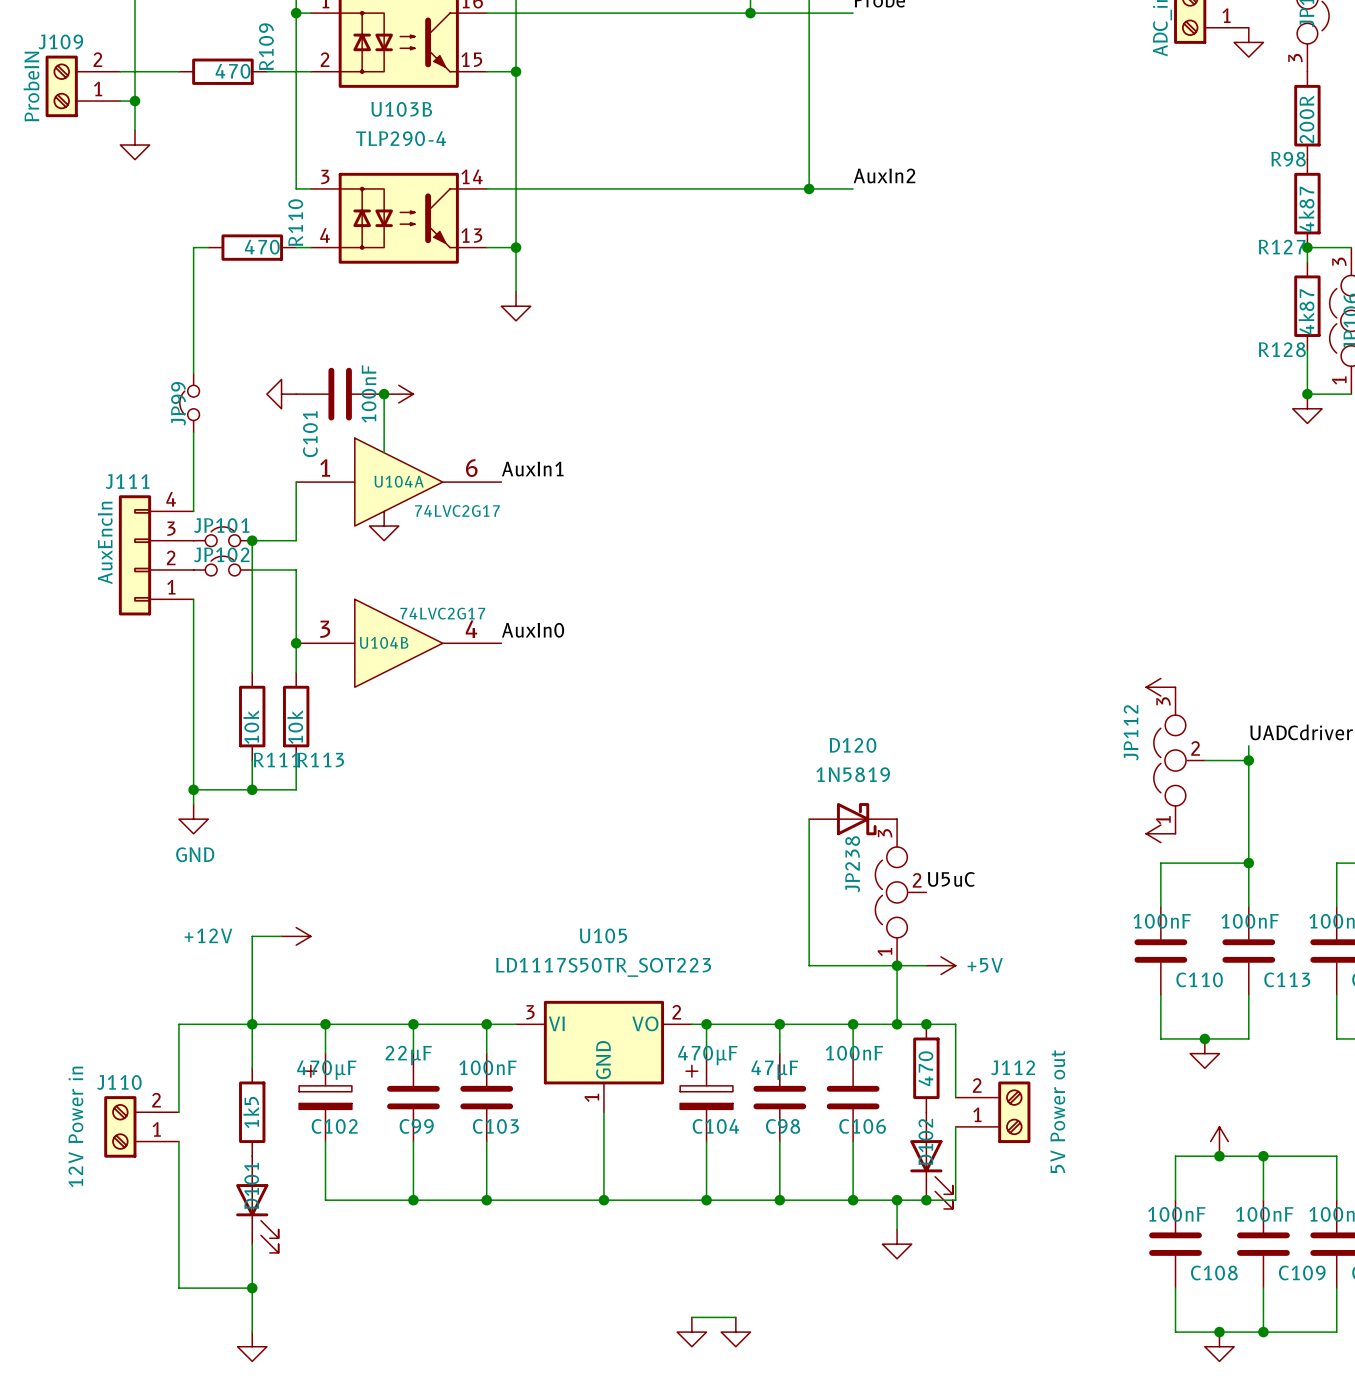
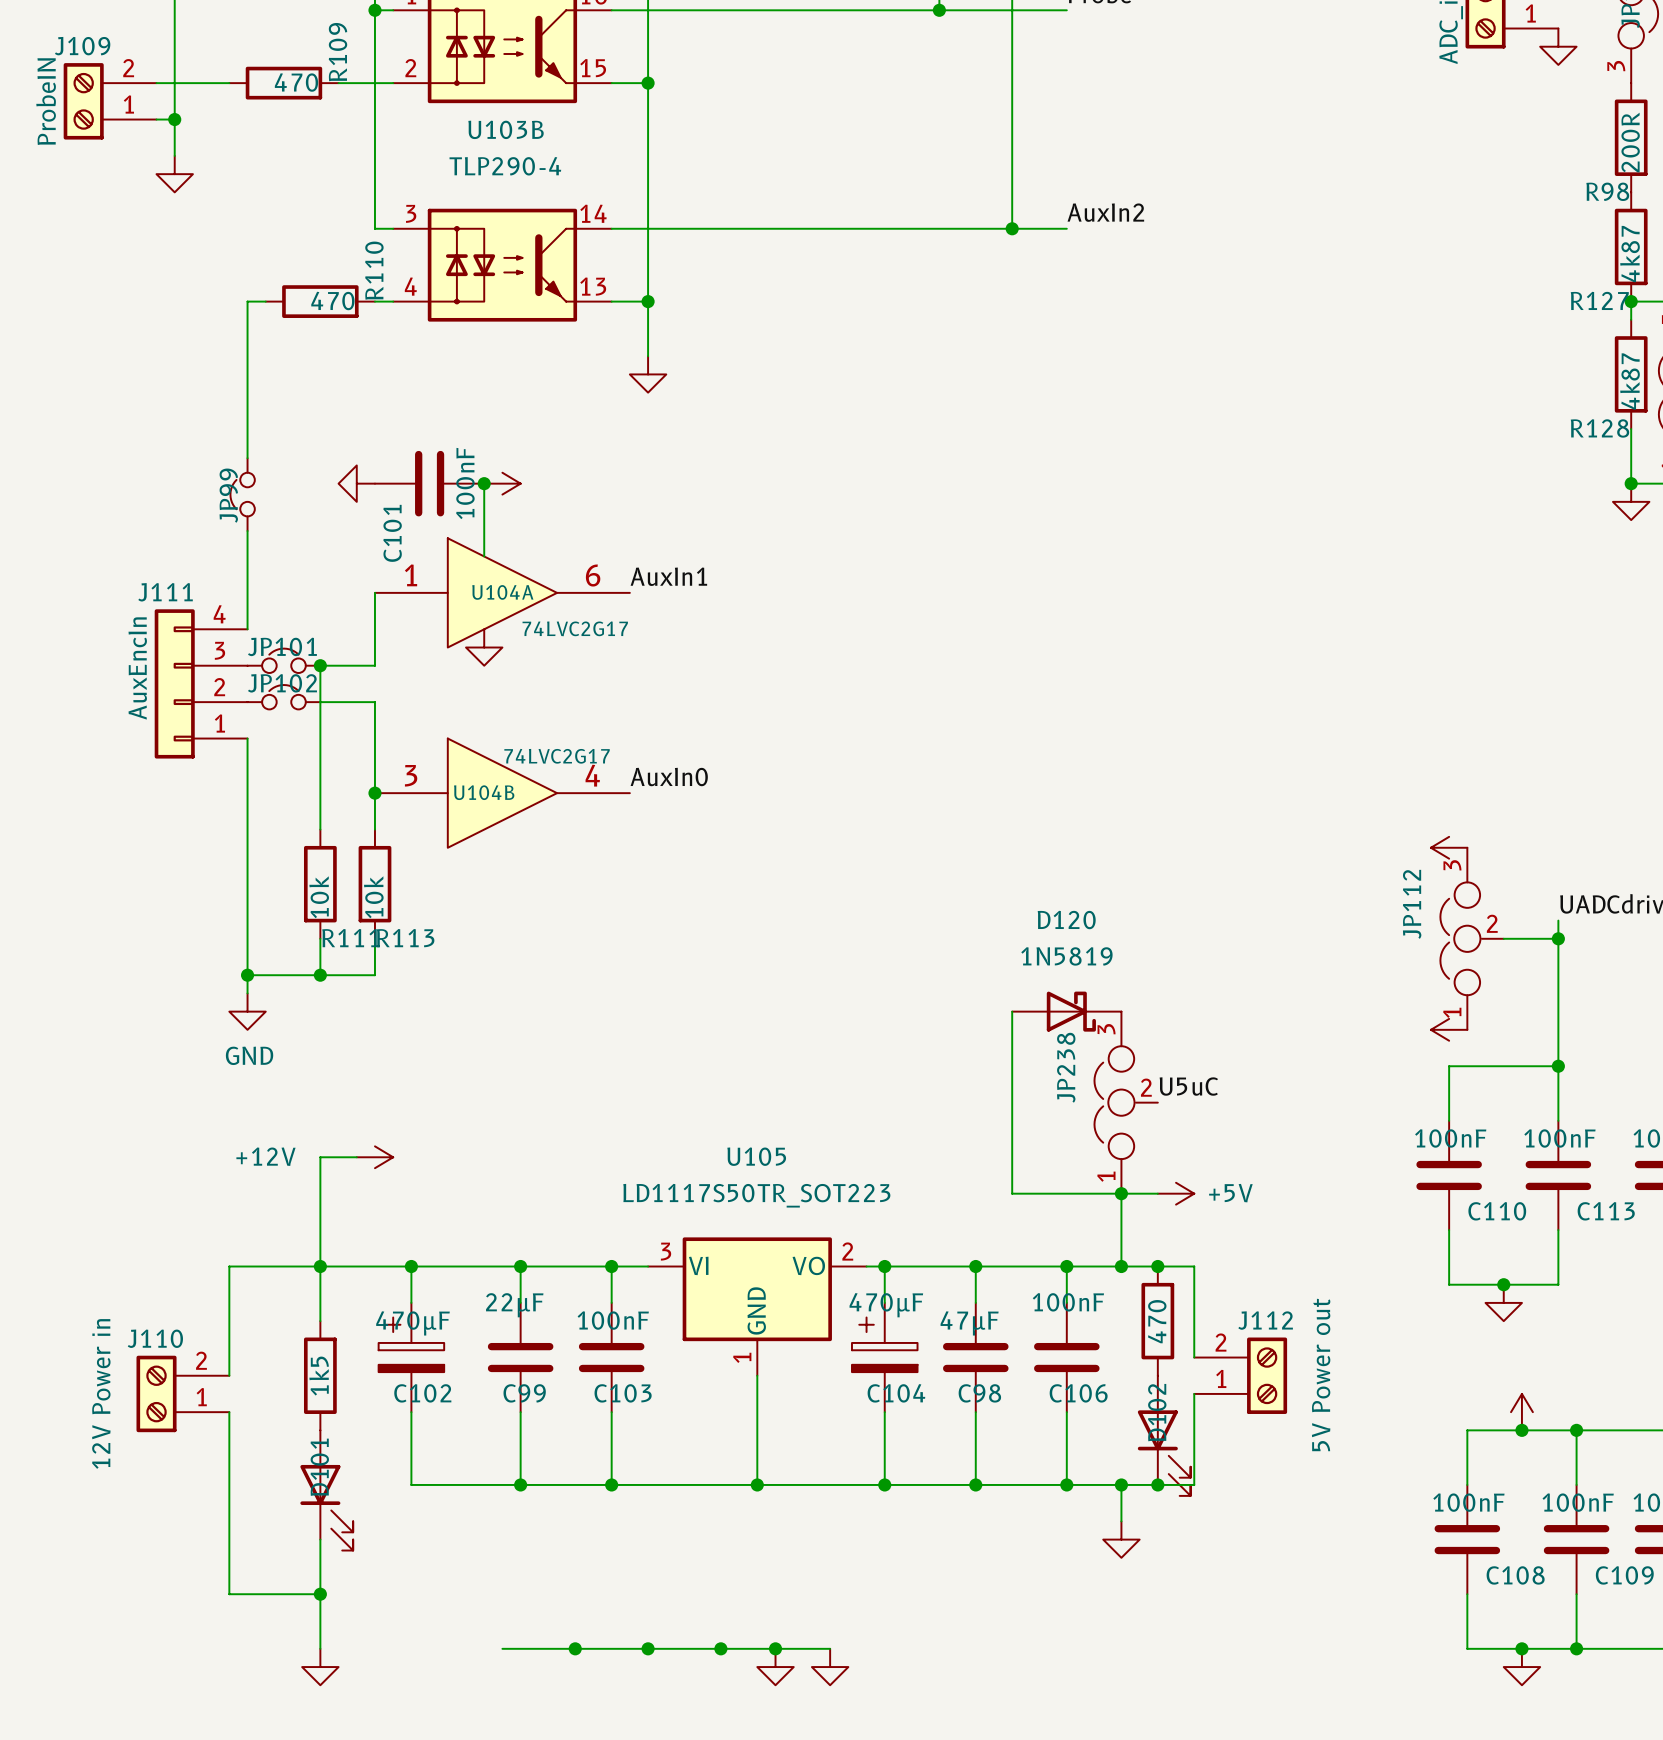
wire: (691, 1317) (735, 1317) -> none
wire: none -> (502, 1648) (830, 1648)
junction: none -> (575, 1648)
junction: none -> (648, 1648)
junction: none -> (720, 1648)
junction: none -> (775, 1648)
power symbol position: (691, 1332) -> (830, 1667)
power symbol: (735, 1332) -> none
power symbol: none -> (775, 1667)

